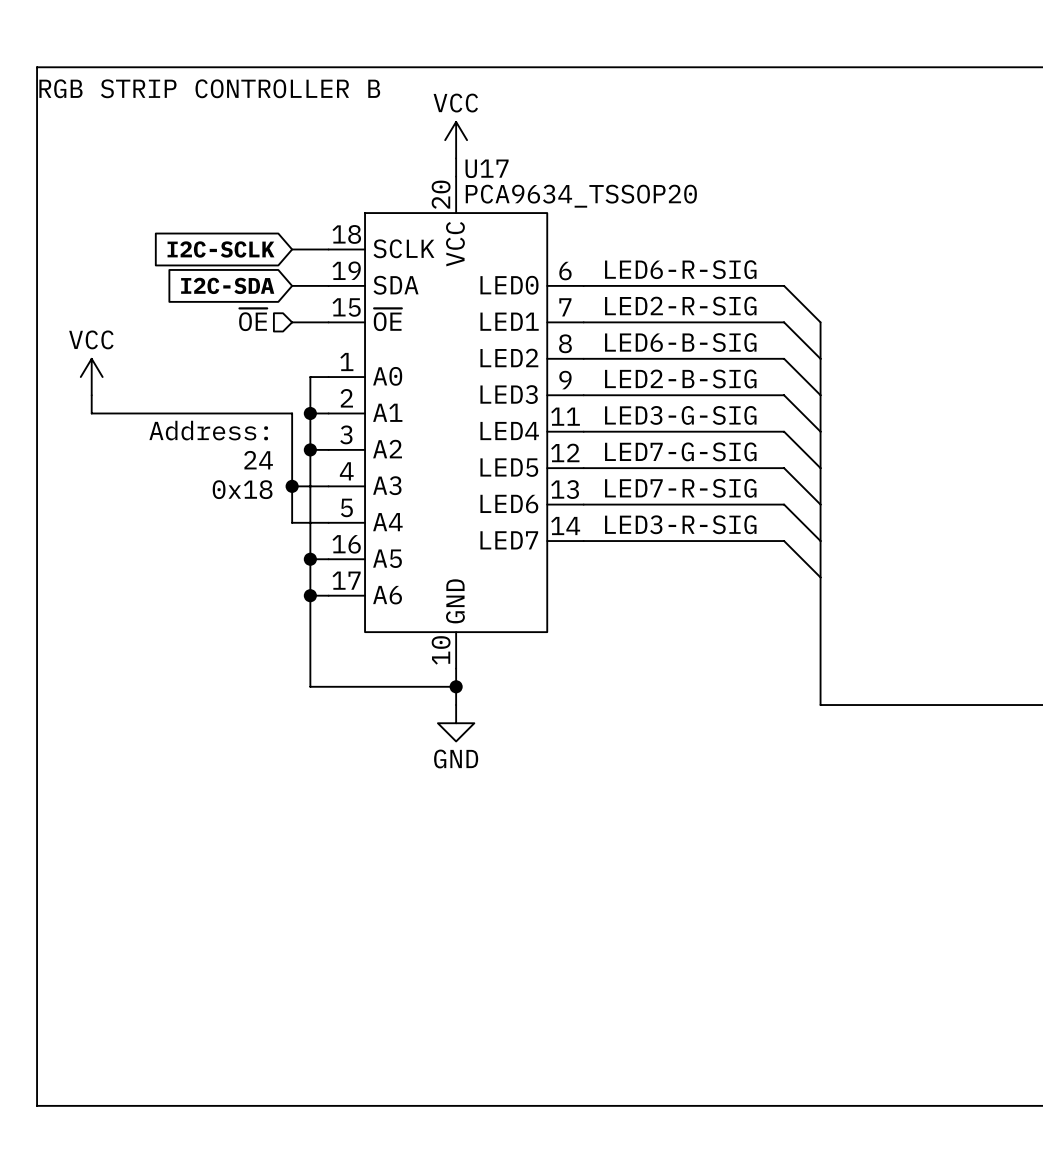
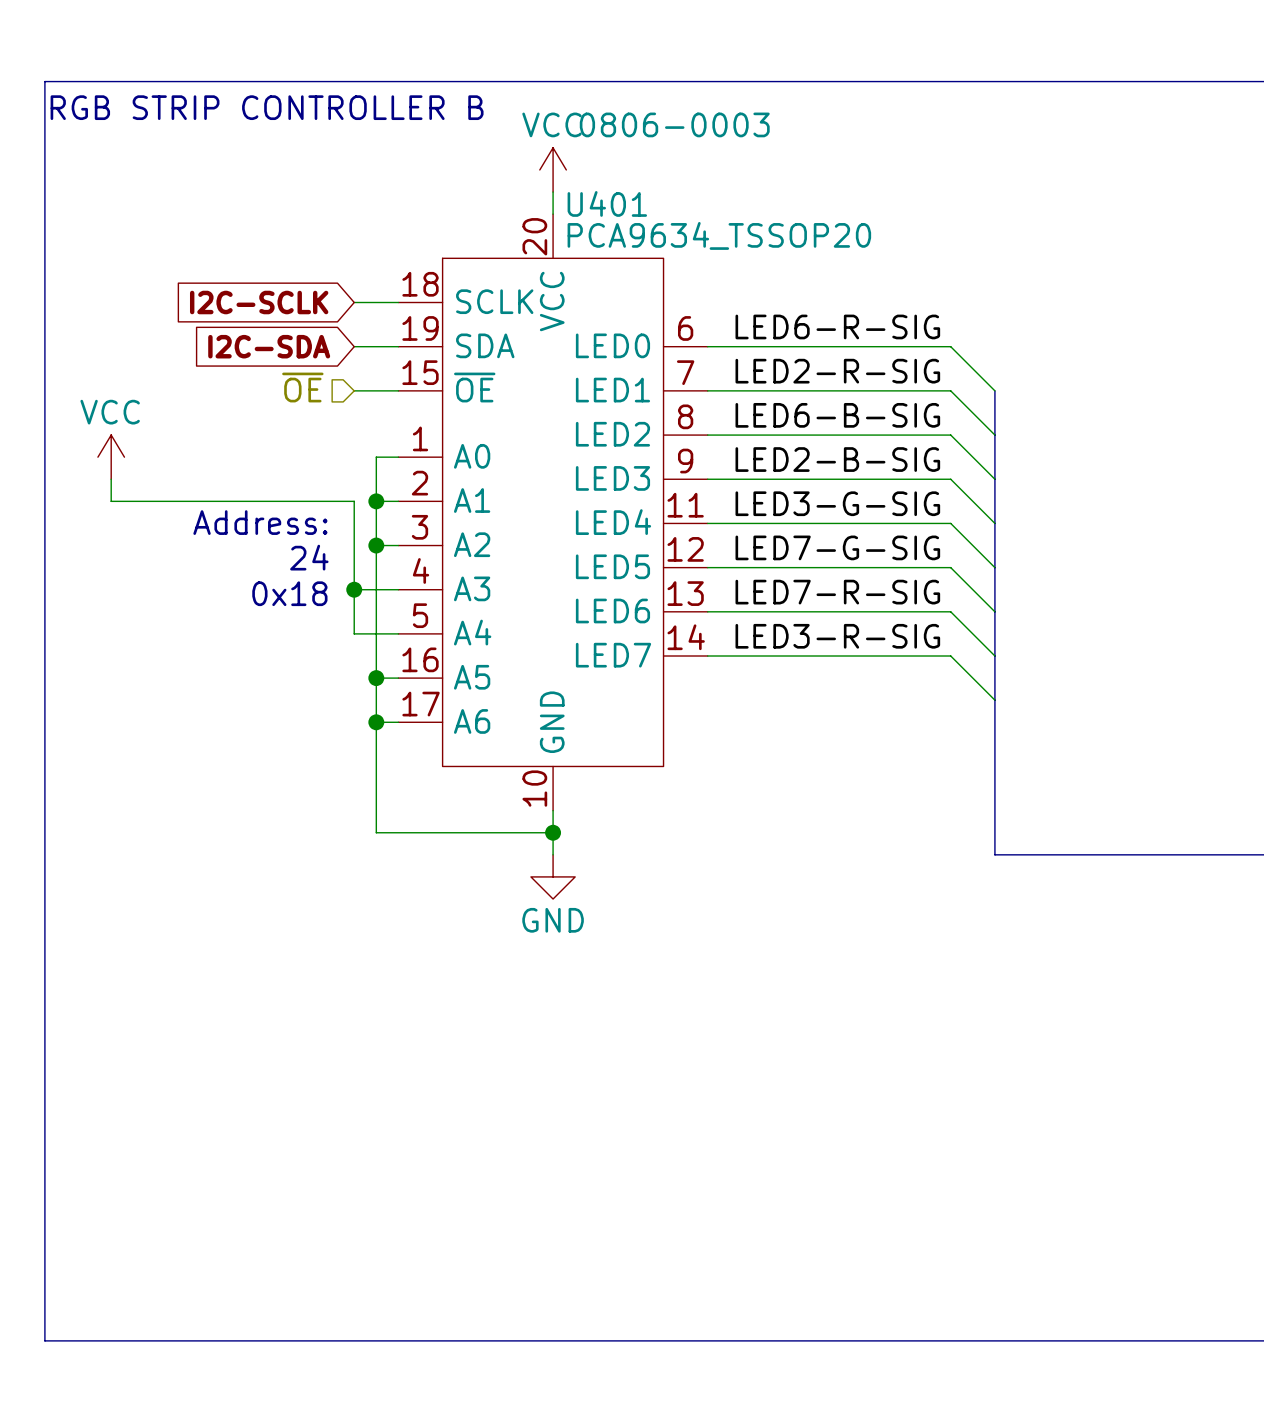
U17 text: none -> 0806-0003 (674, 124)
U17 name: U17 (487, 168) -> U401 (607, 203)

